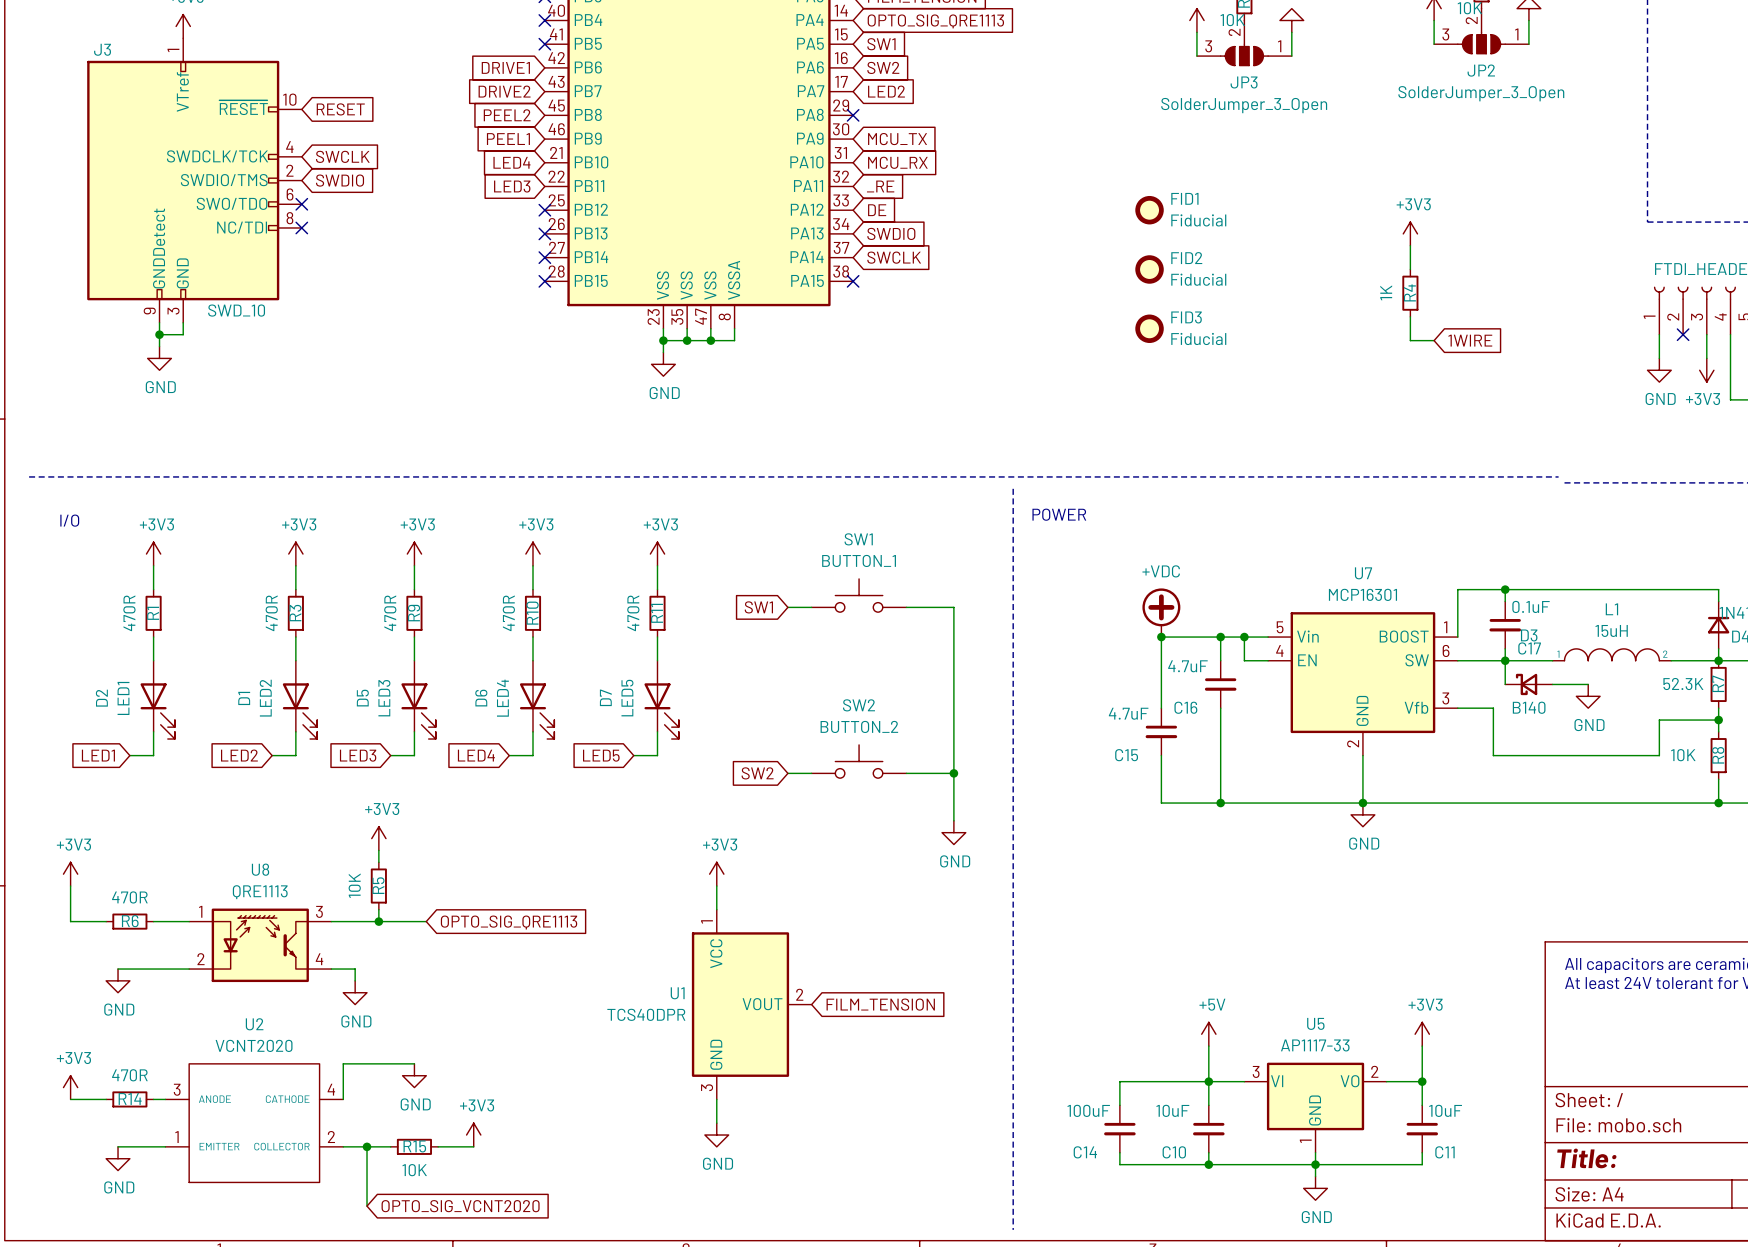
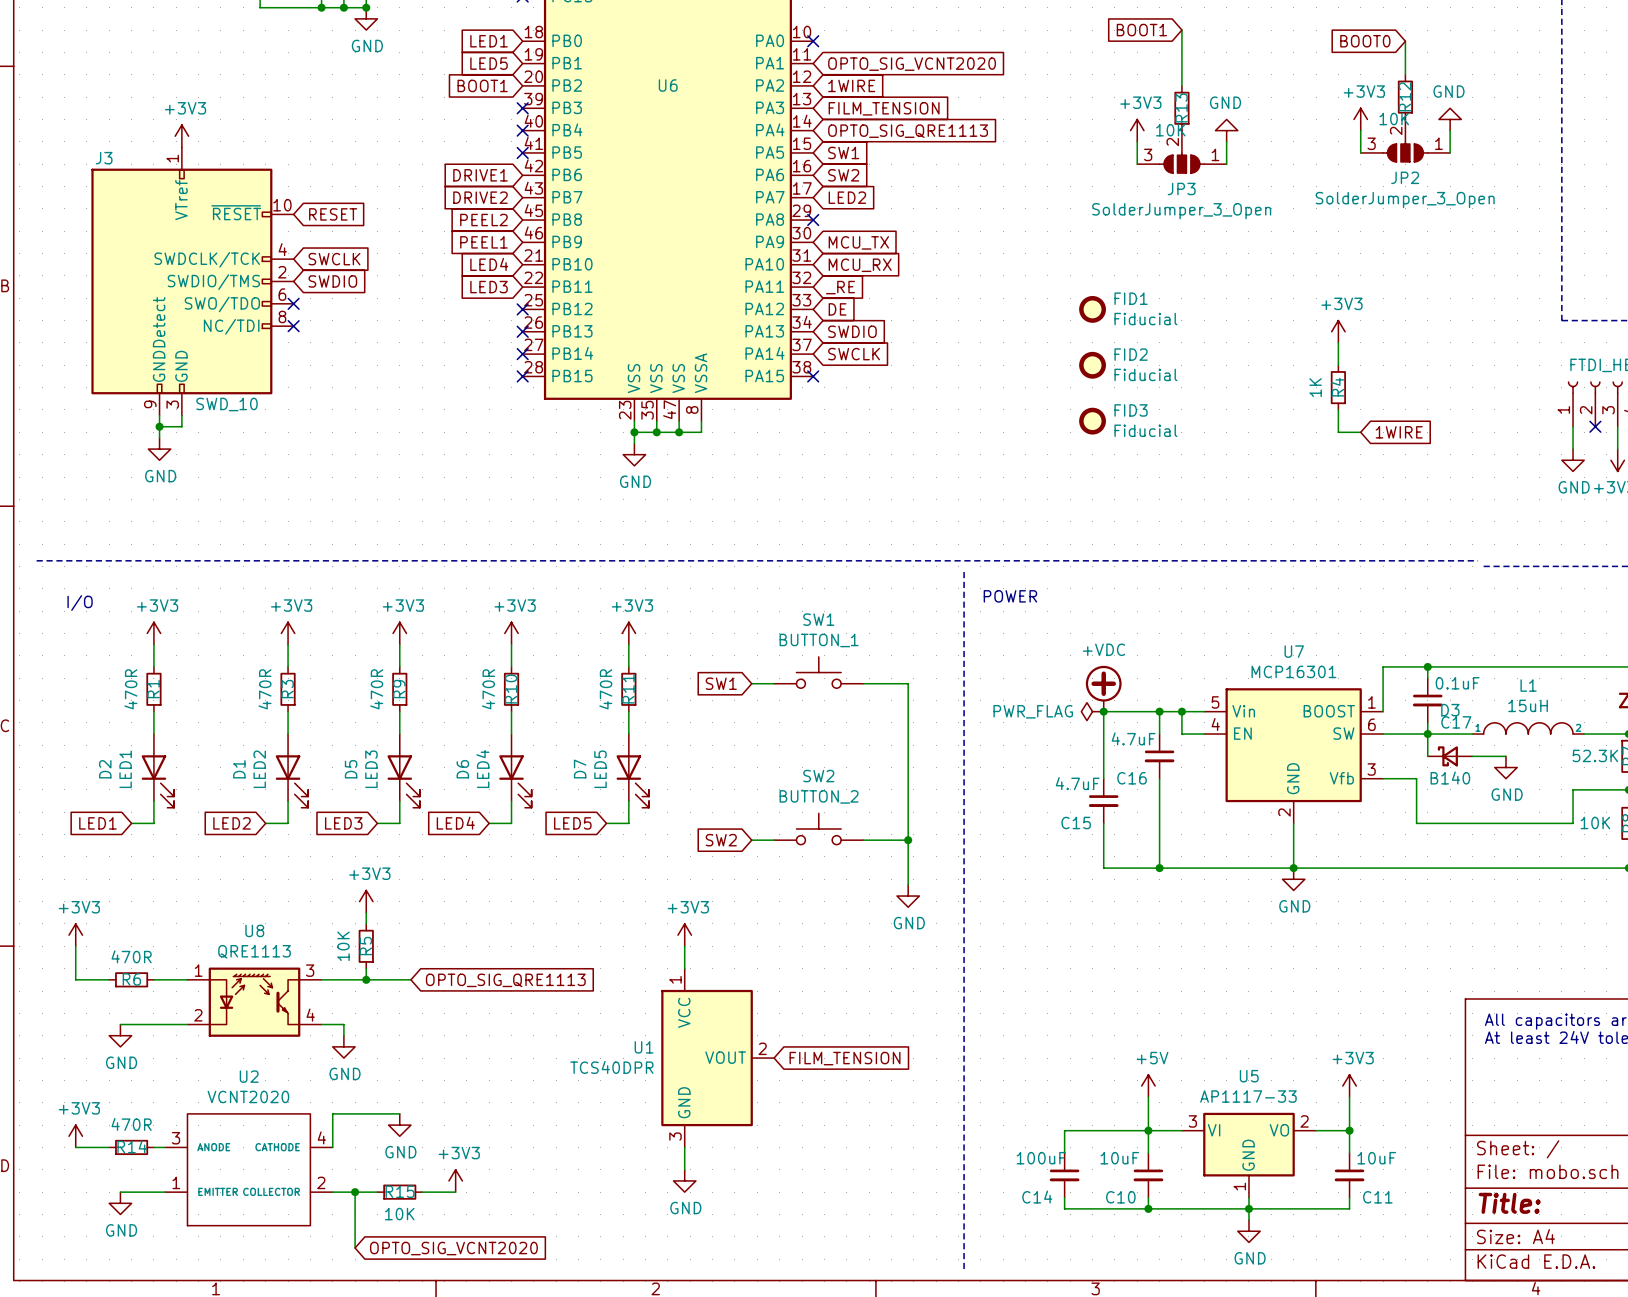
power symbol: none -> PWR_FLAG (1092, 711)

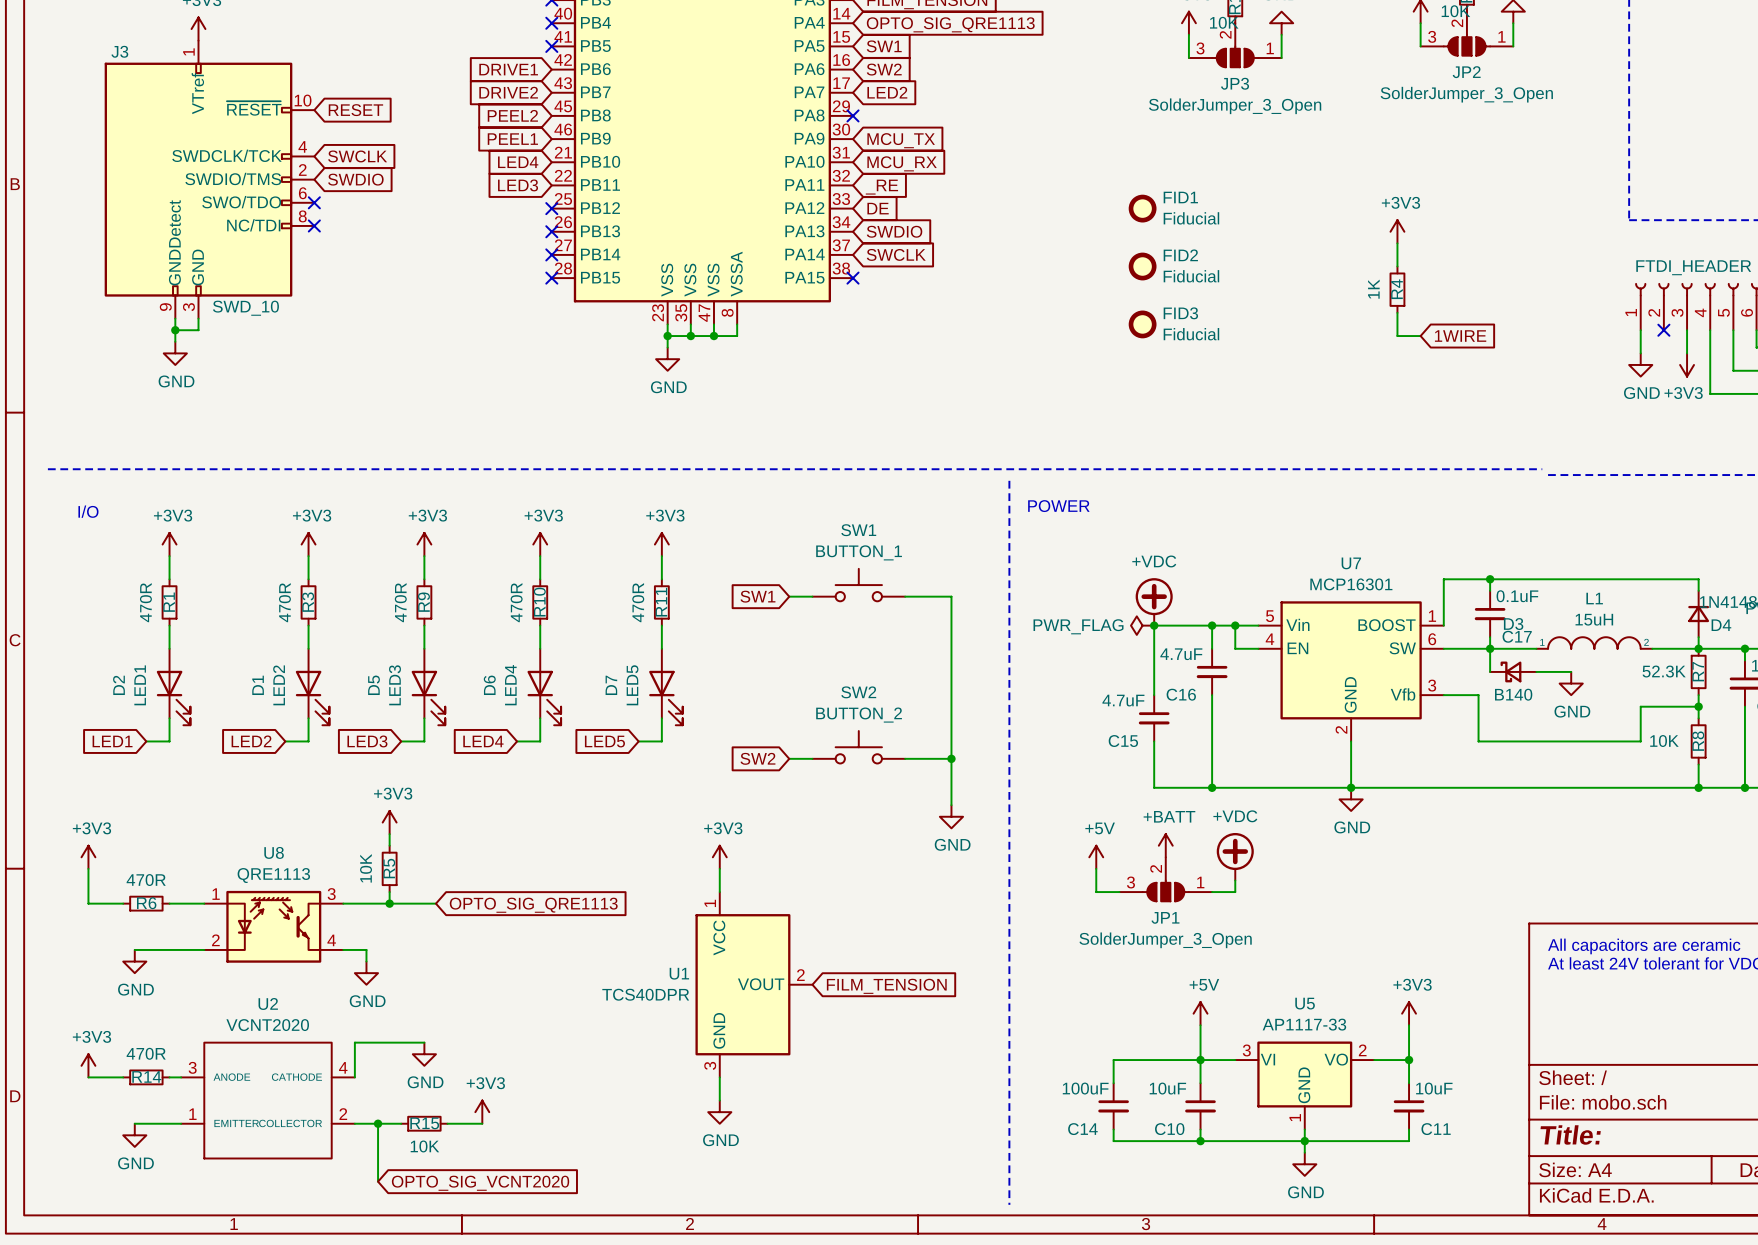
power symbol: none -> +BATT (1165, 845)
power symbol: none -> +VDC (1235, 856)
power symbol: none -> +5V (1096, 857)
wire: none -> (1096, 868) (1096, 892) (1119, 892)
JP1: none -> SolderJumper_3_Open (1165, 879)
wire: none -> (1235, 880) (1235, 892) (1212, 892)

